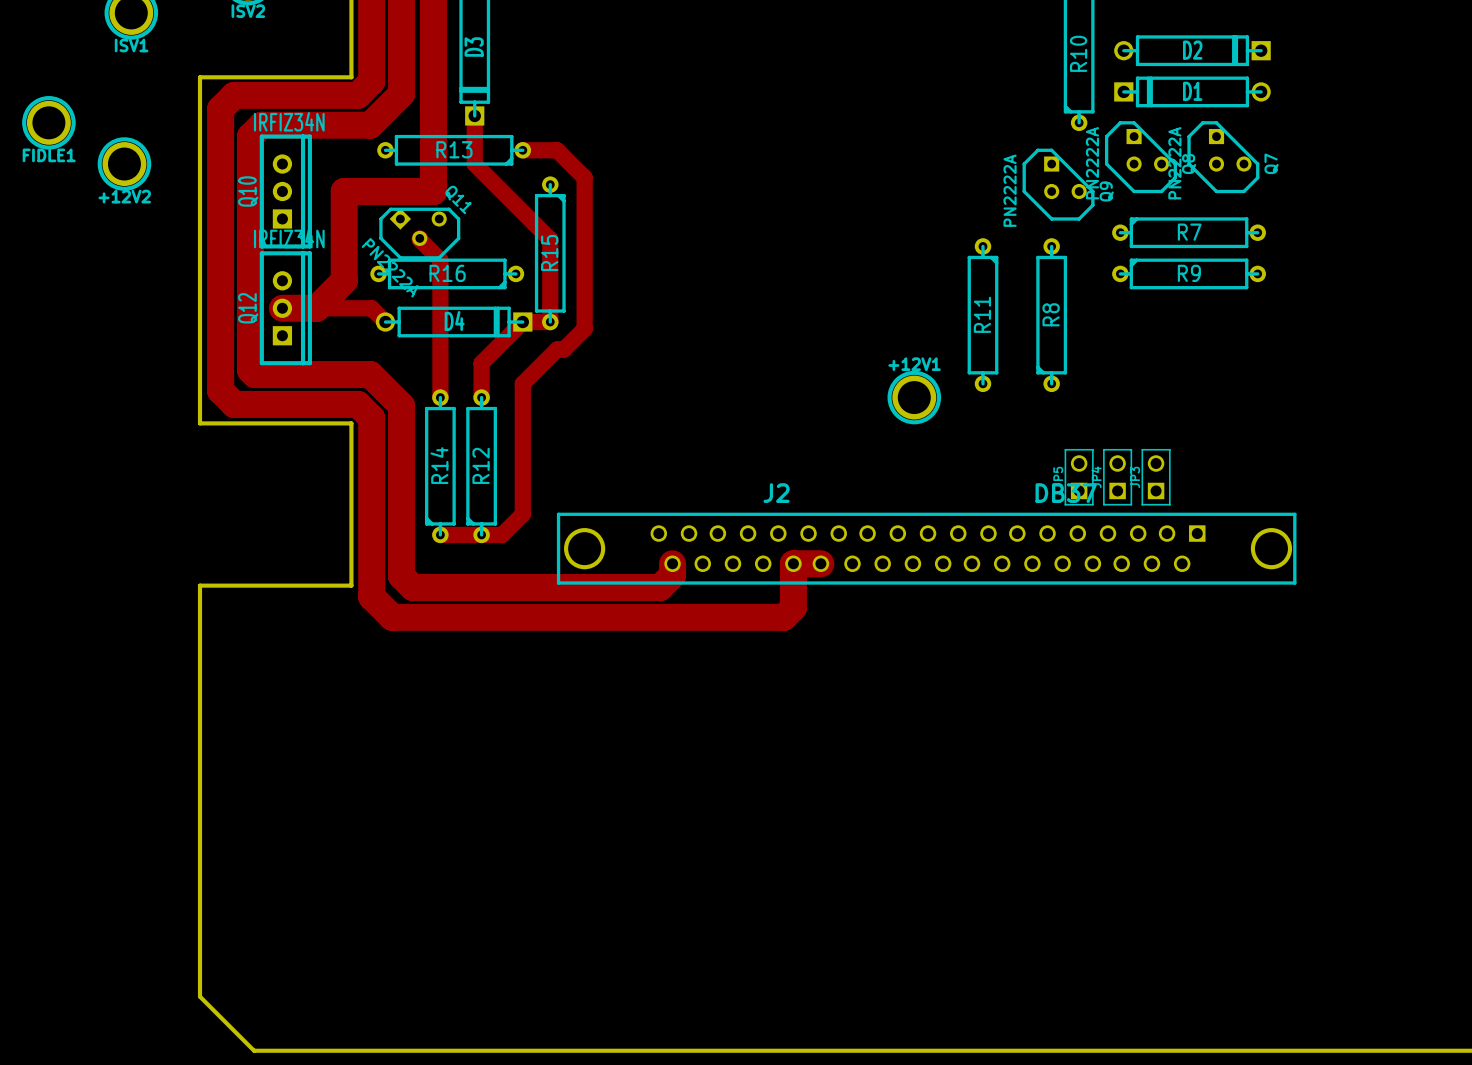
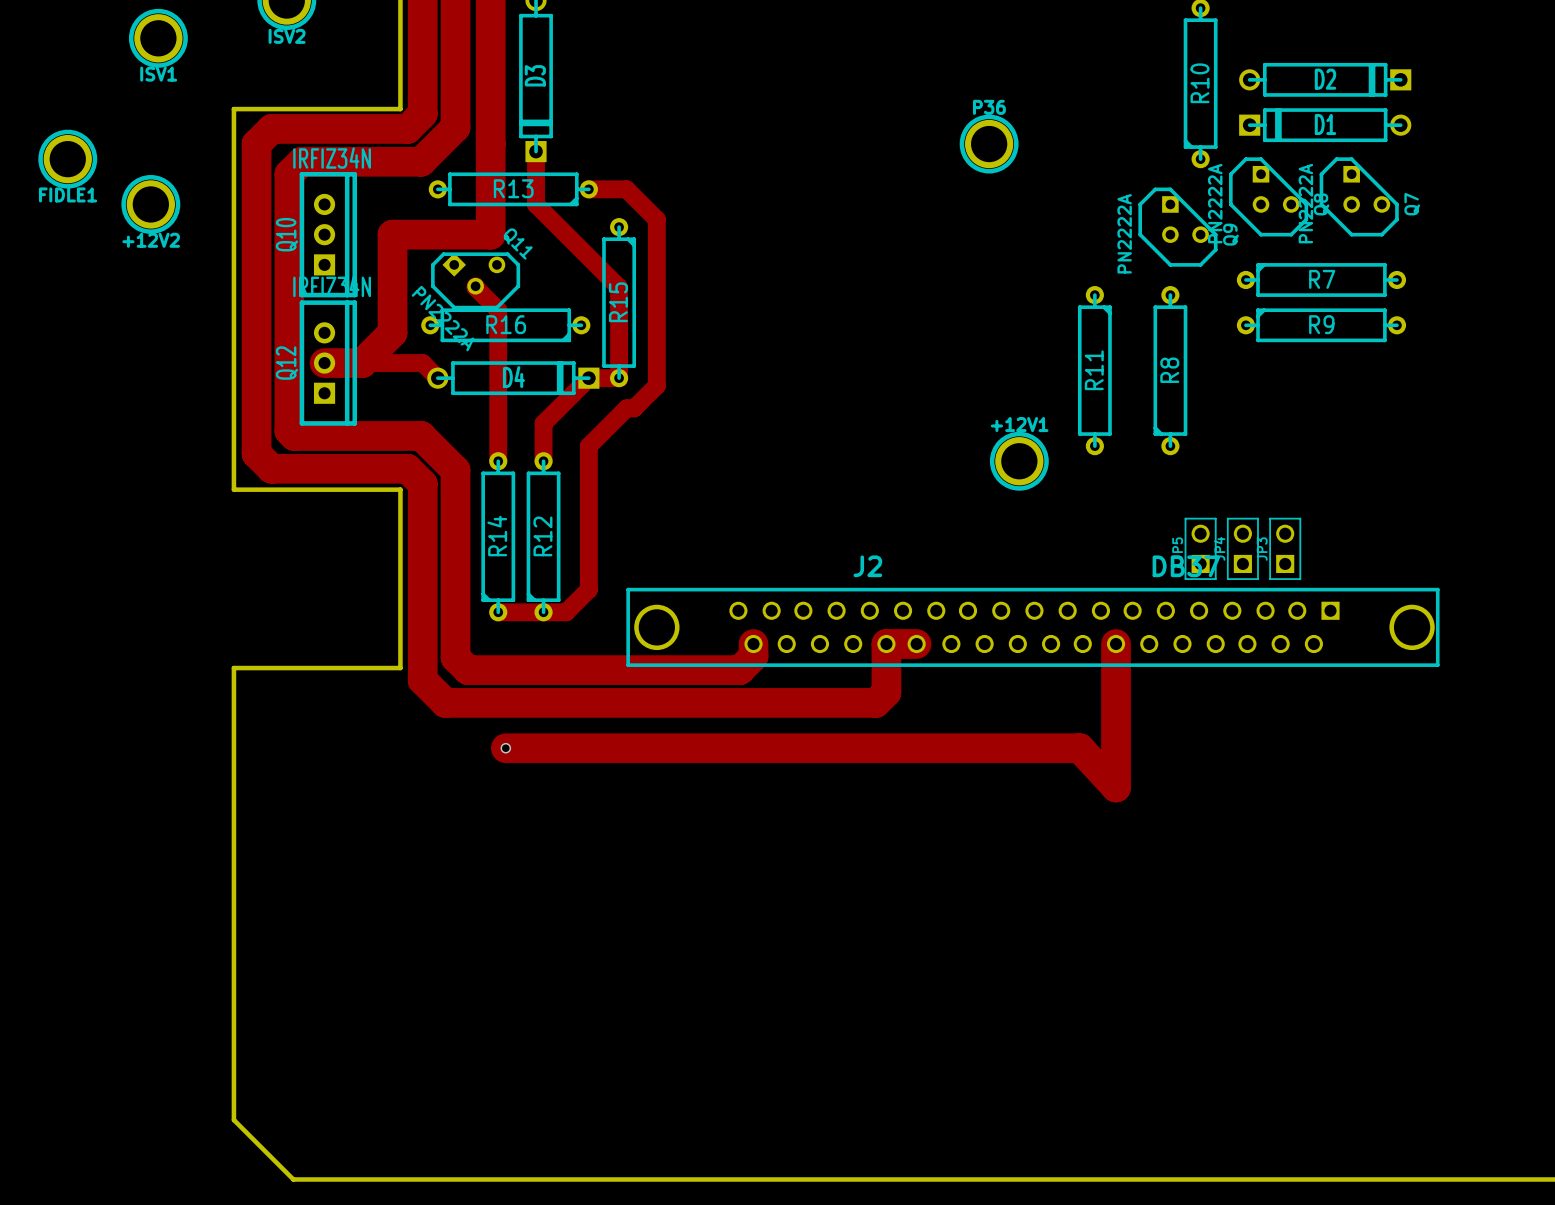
P36: none -> (989, 144)
track: none -> (1116, 644) (1116, 787) (1079, 748) (505, 748)
via: none -> (505, 748)

